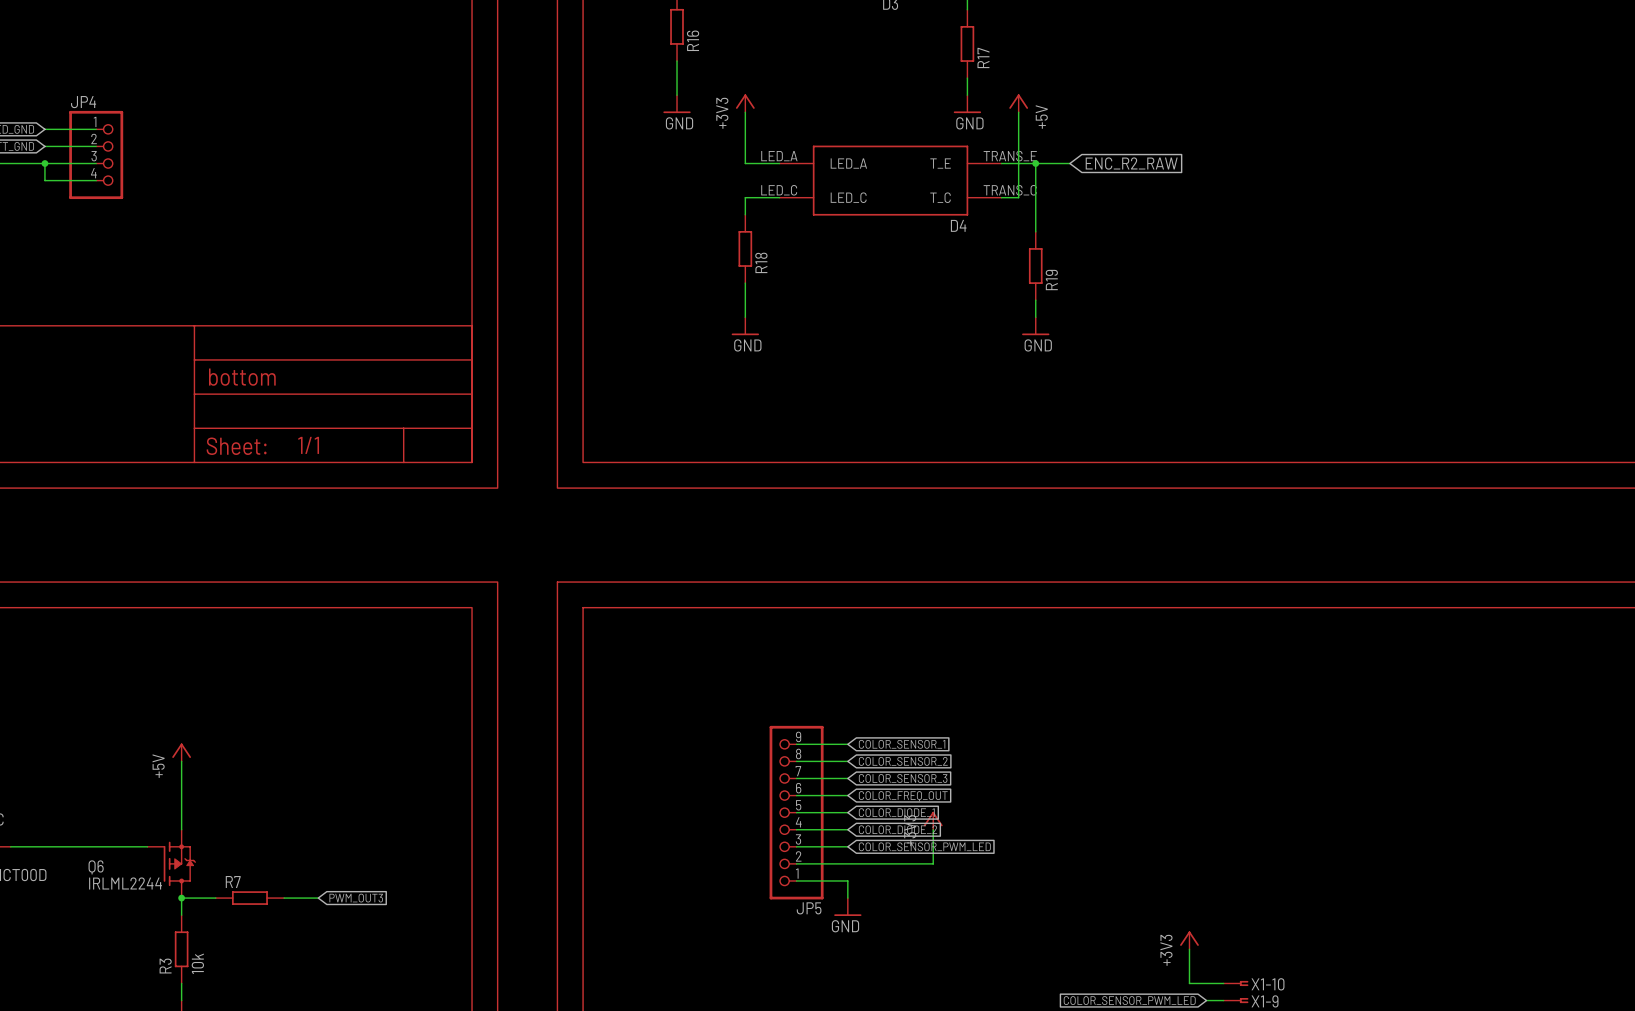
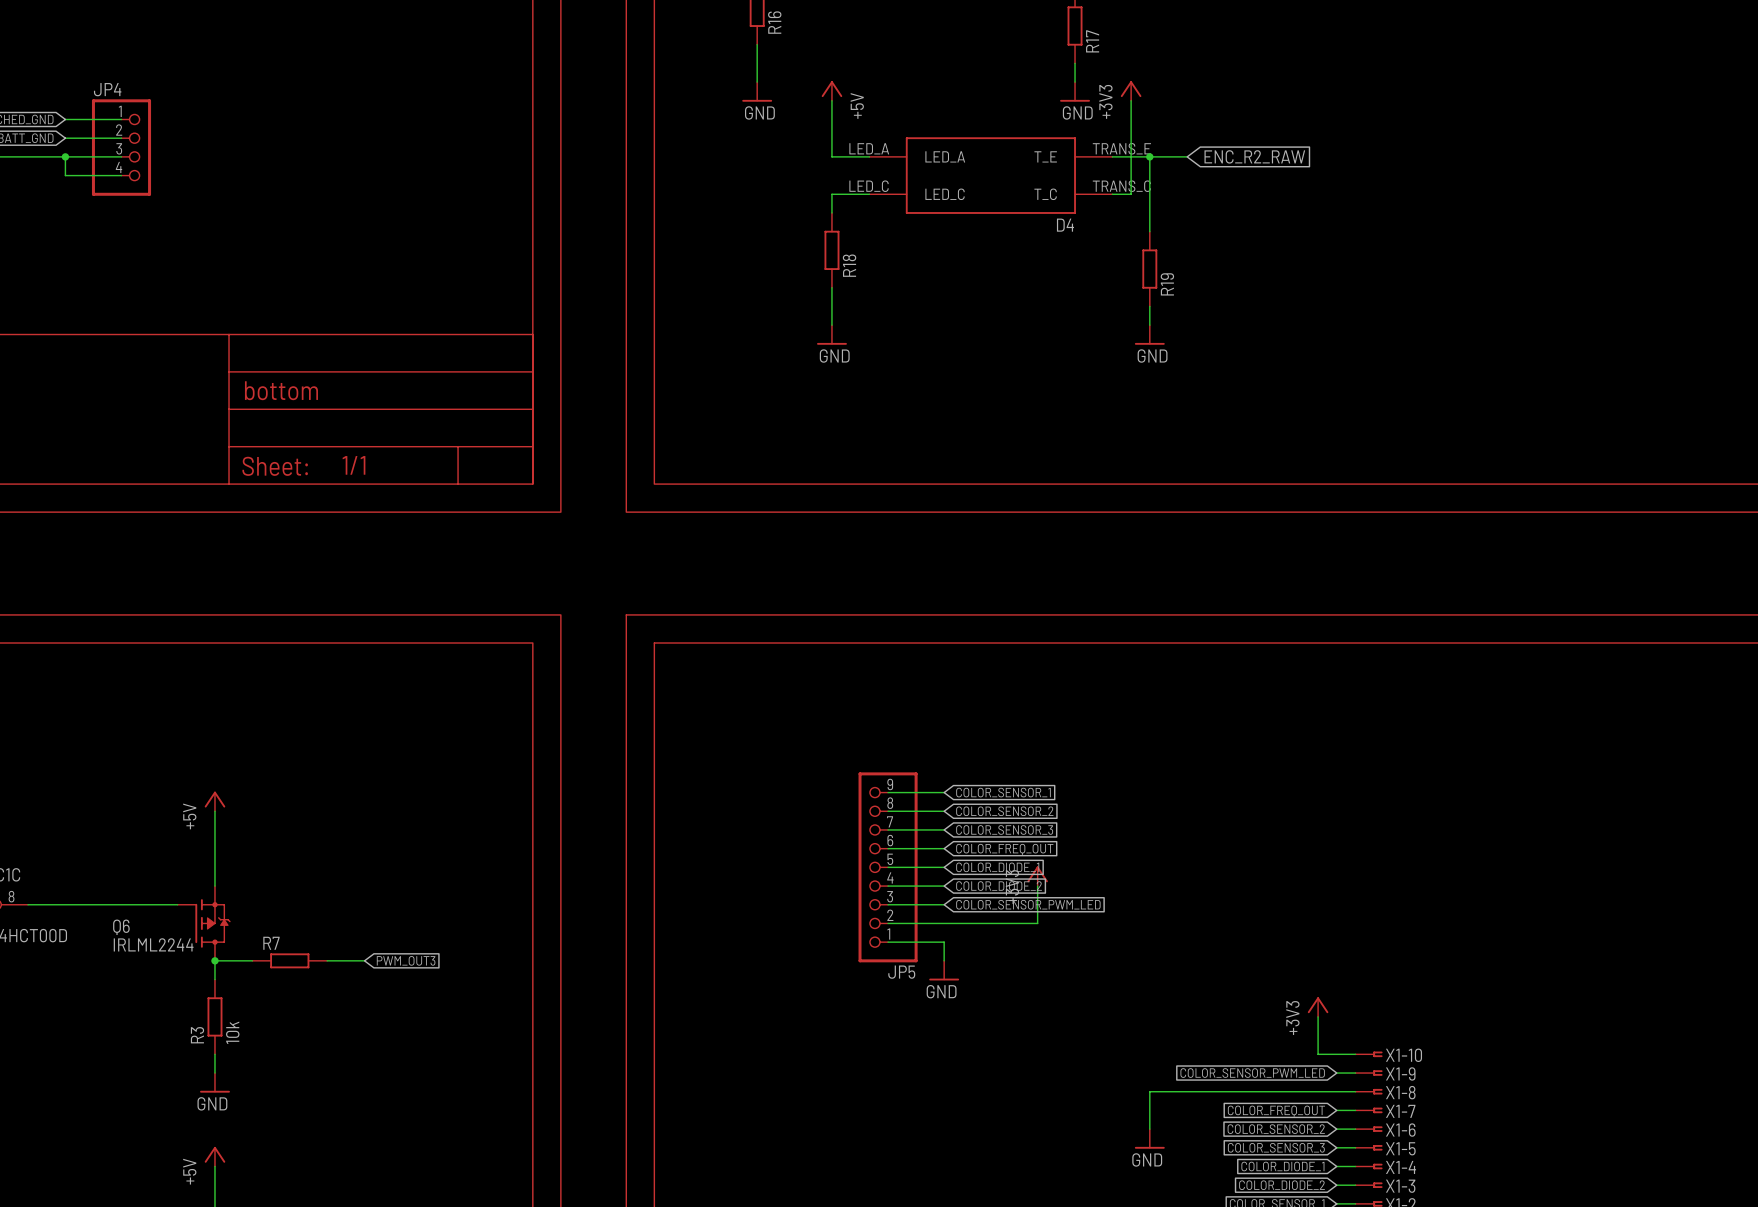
power symbol: +3V3 (745, 103) -> +5V (831, 90)
power symbol: +5V (1018, 103) -> +3V3 (1131, 90)

